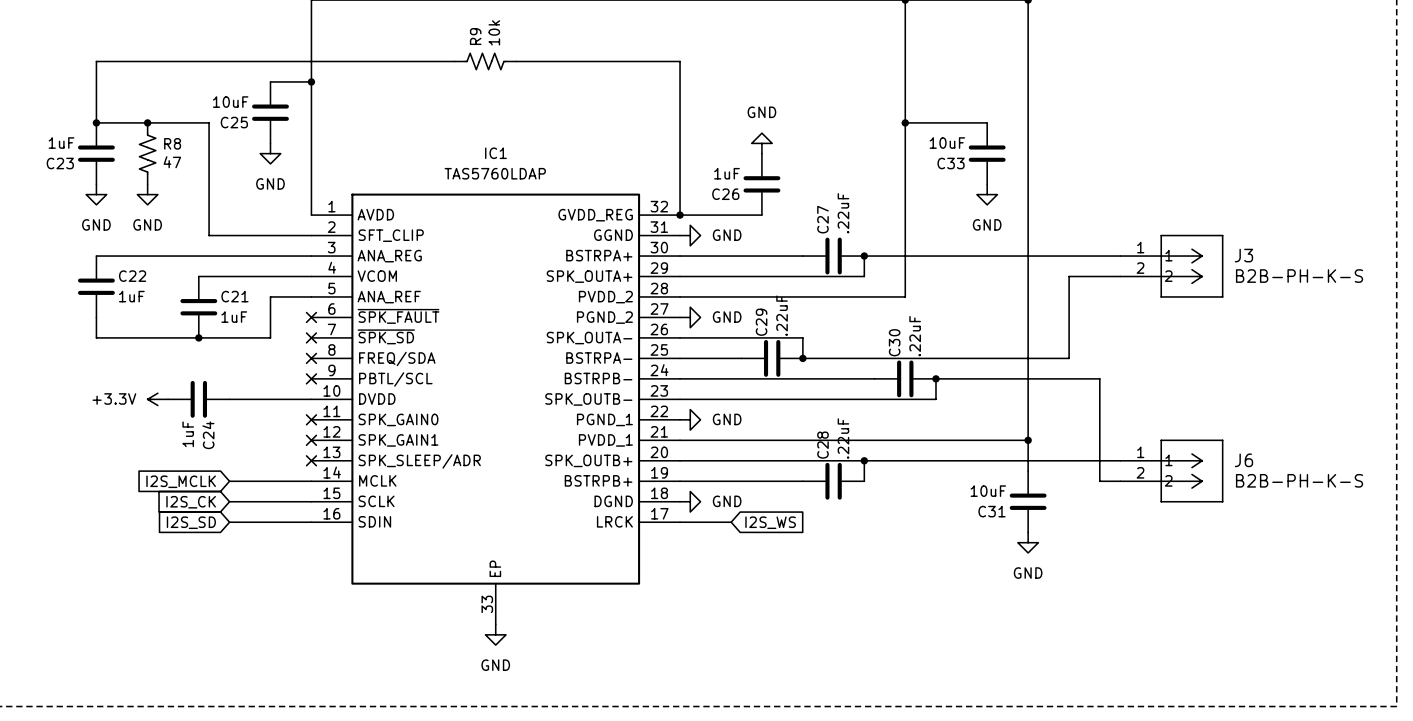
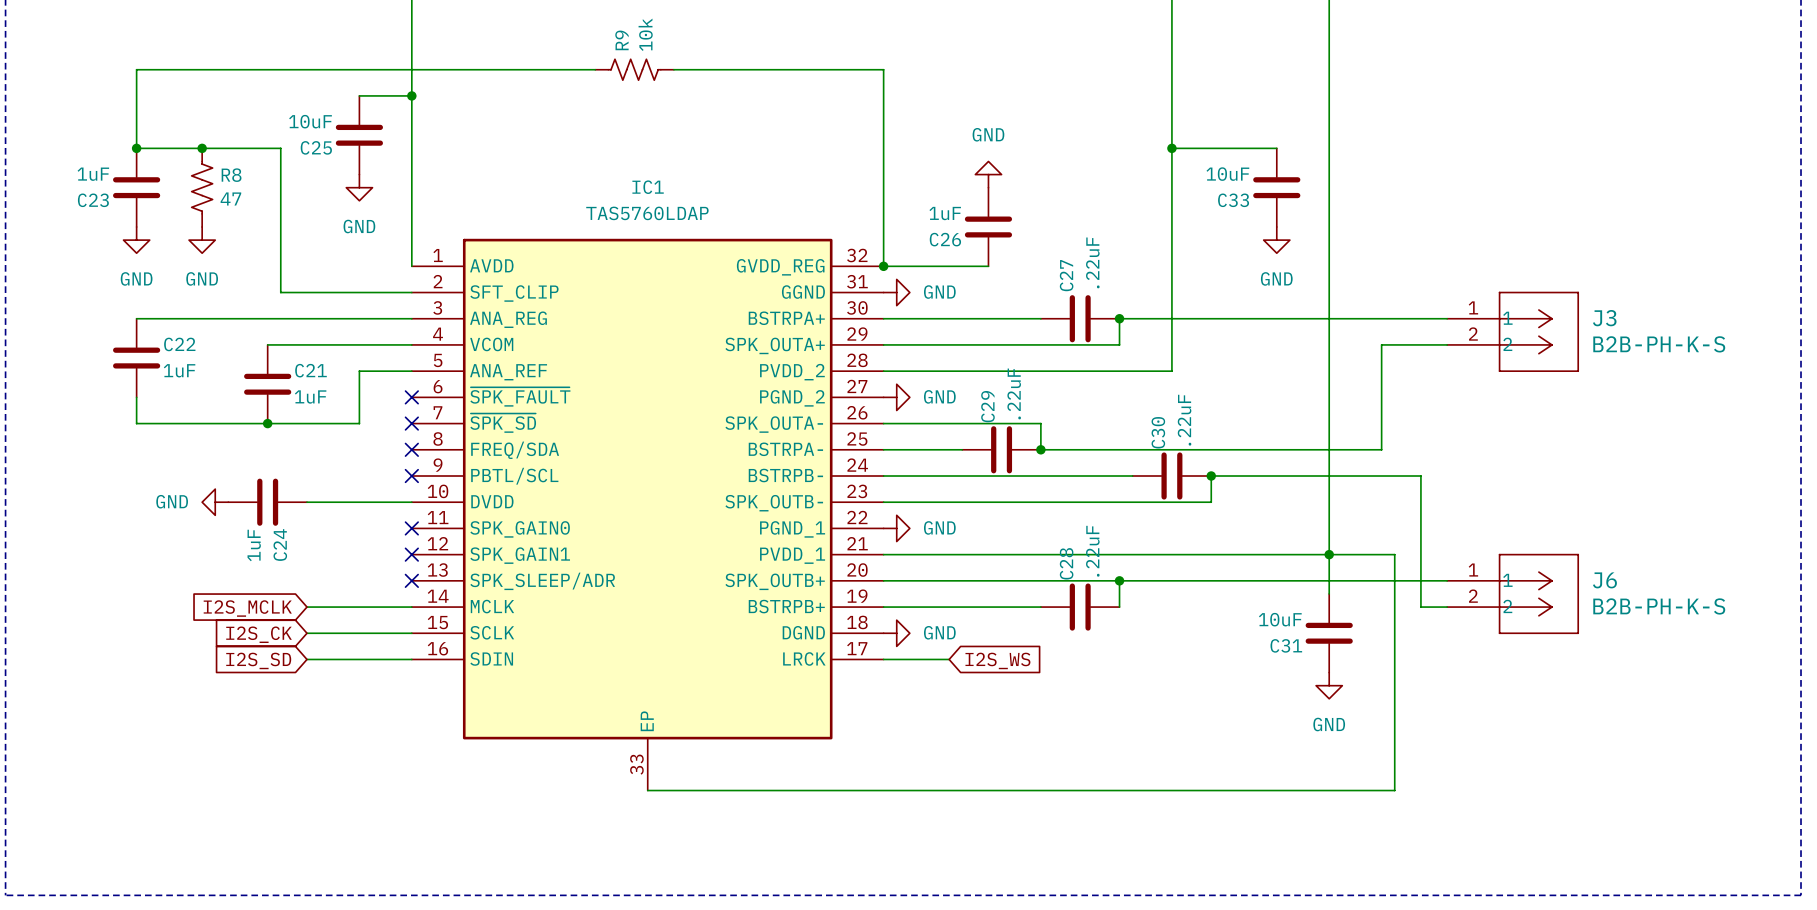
power symbol: +3.3V (157, 399) -> GND (215, 502)
wire: none -> (1329, 554) (1394, 554) (1394, 790) (647, 790)
power symbol: GND (495, 634) -> none

